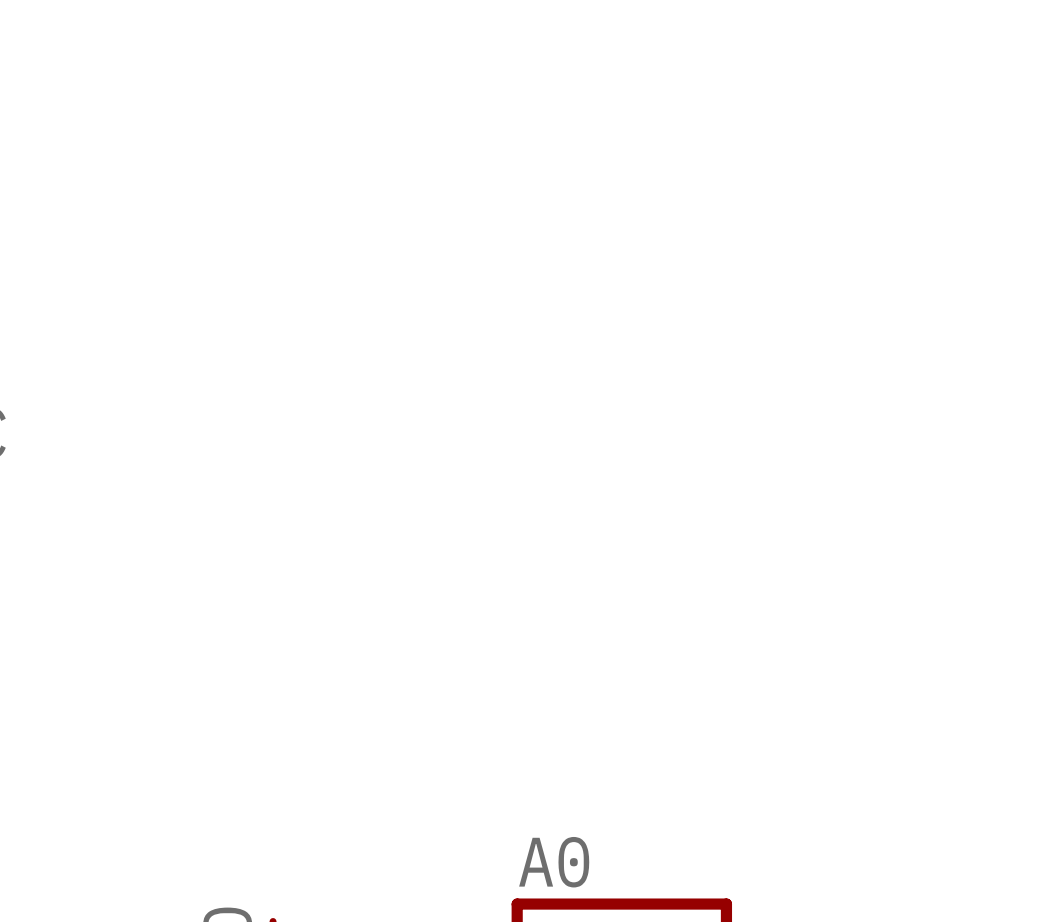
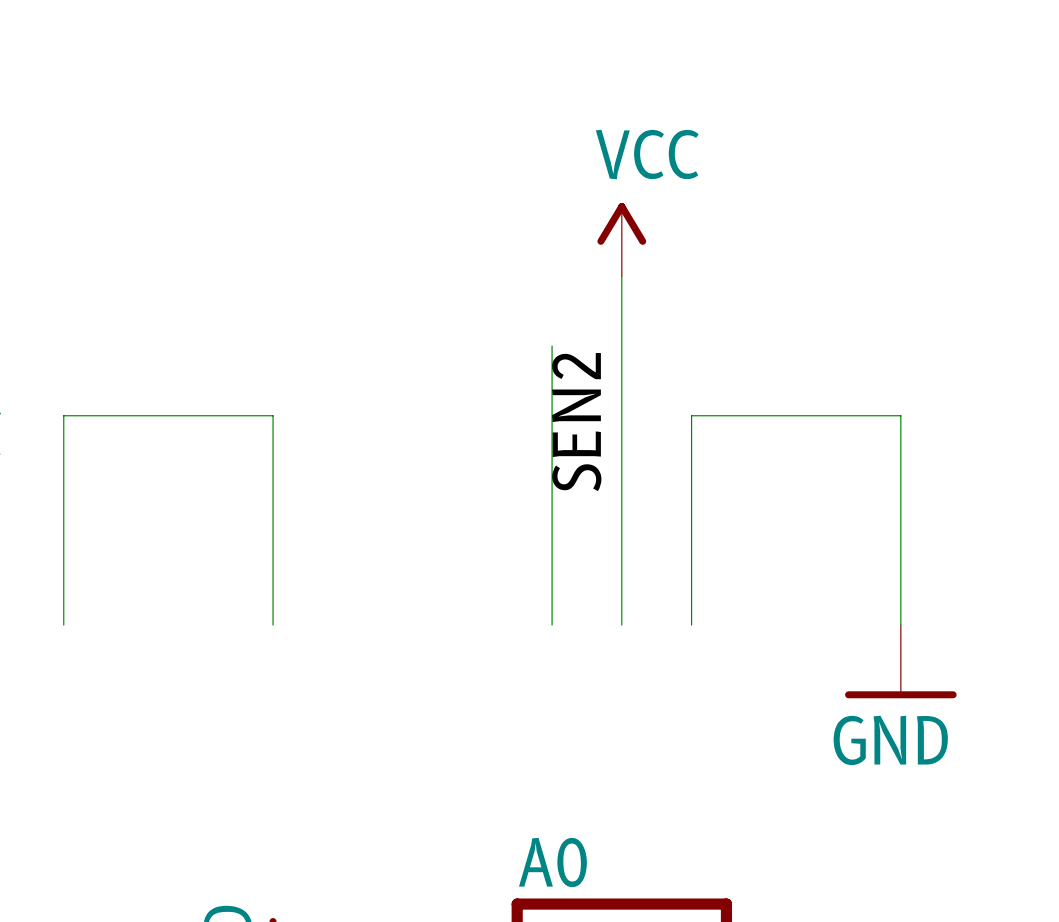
power symbol: none -> VCC (621, 239)
wire: none -> (621, 276) (621, 625)
wire: none -> (552, 346) (552, 625)
label: none -> SEN2 (576, 422)
wire: none -> (63, 625) (63, 415) (273, 415) (273, 625)
wire: none -> (691, 625) (691, 415) (900, 415) (900, 625)
power symbol: none -> GND (900, 661)

